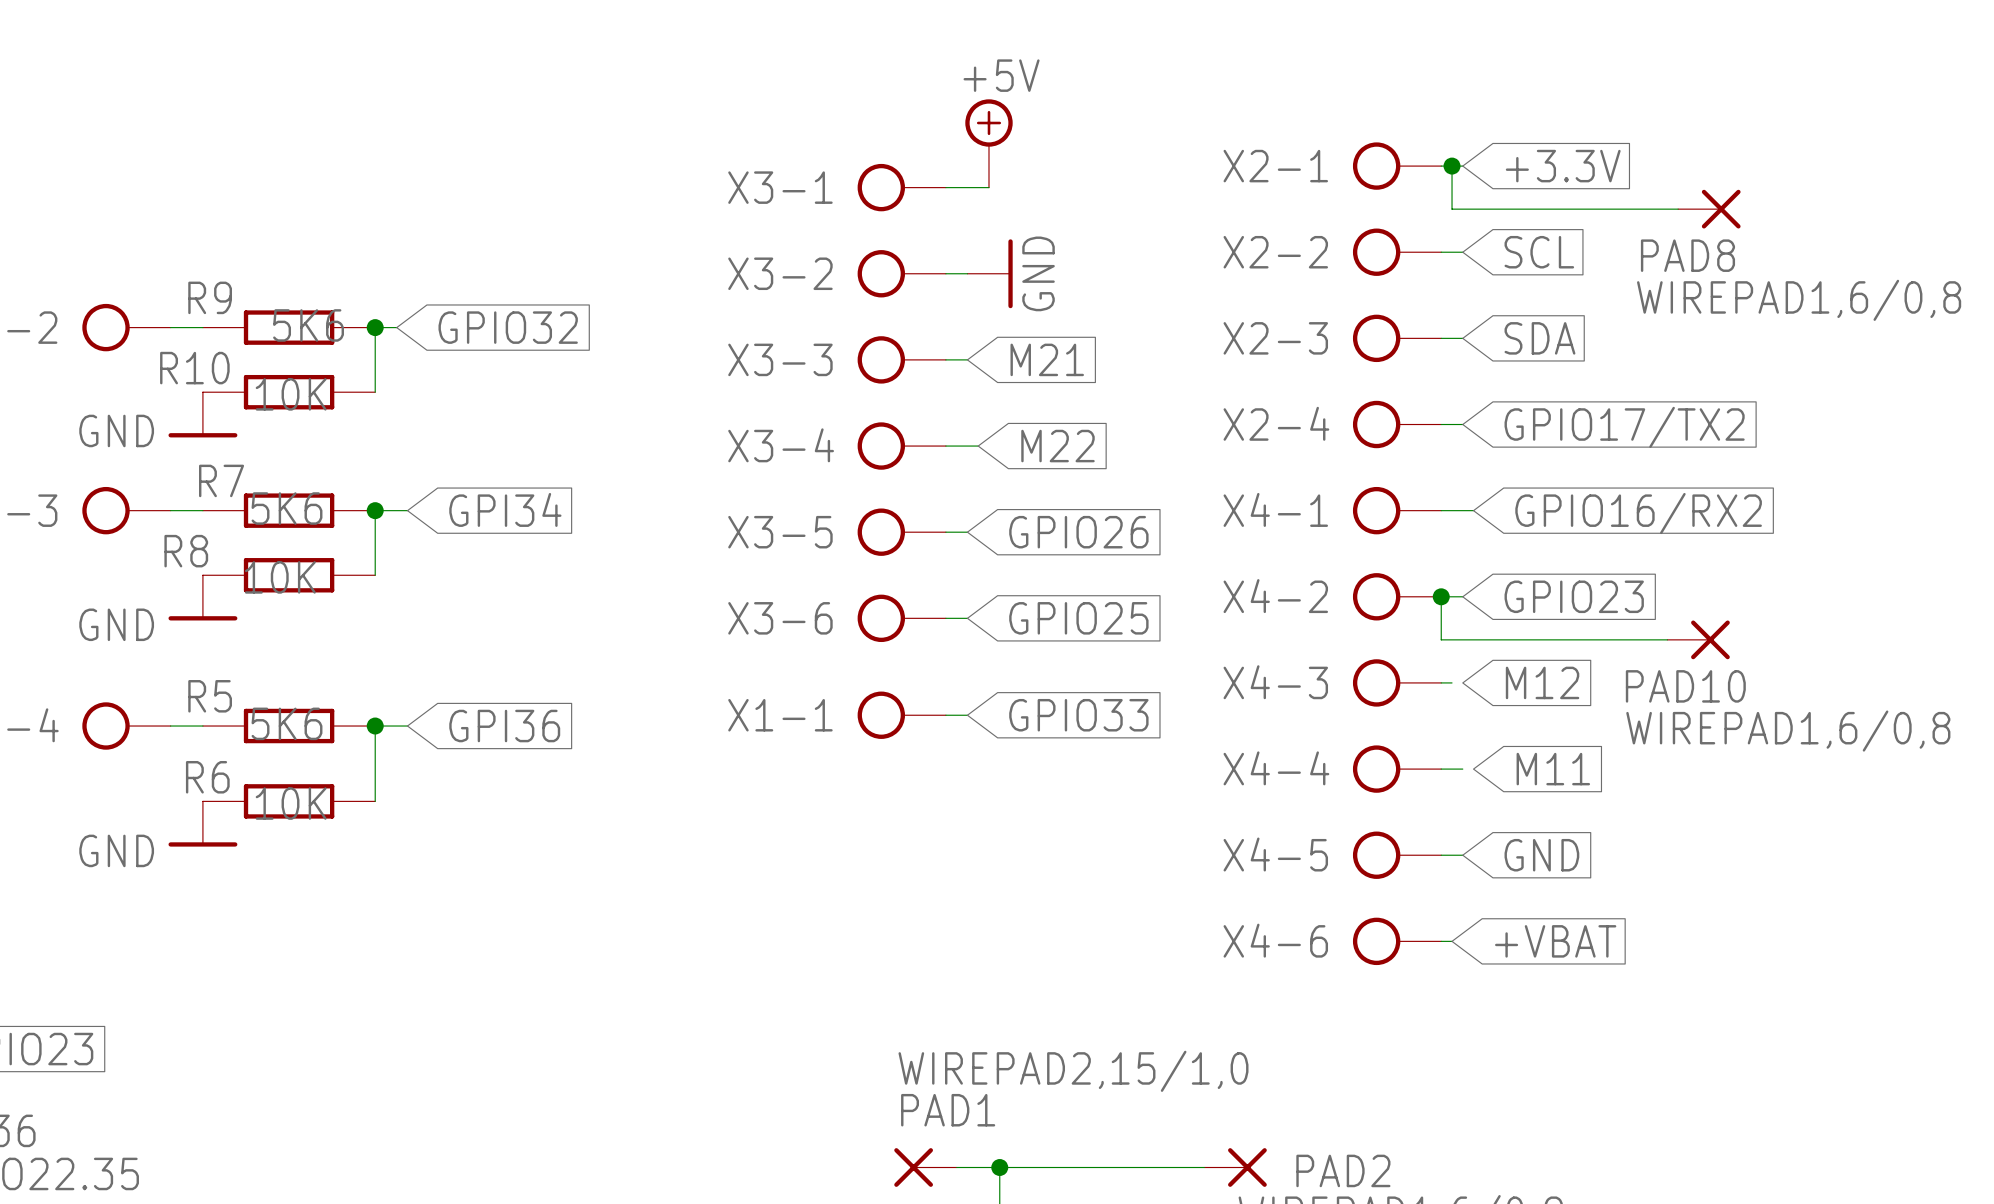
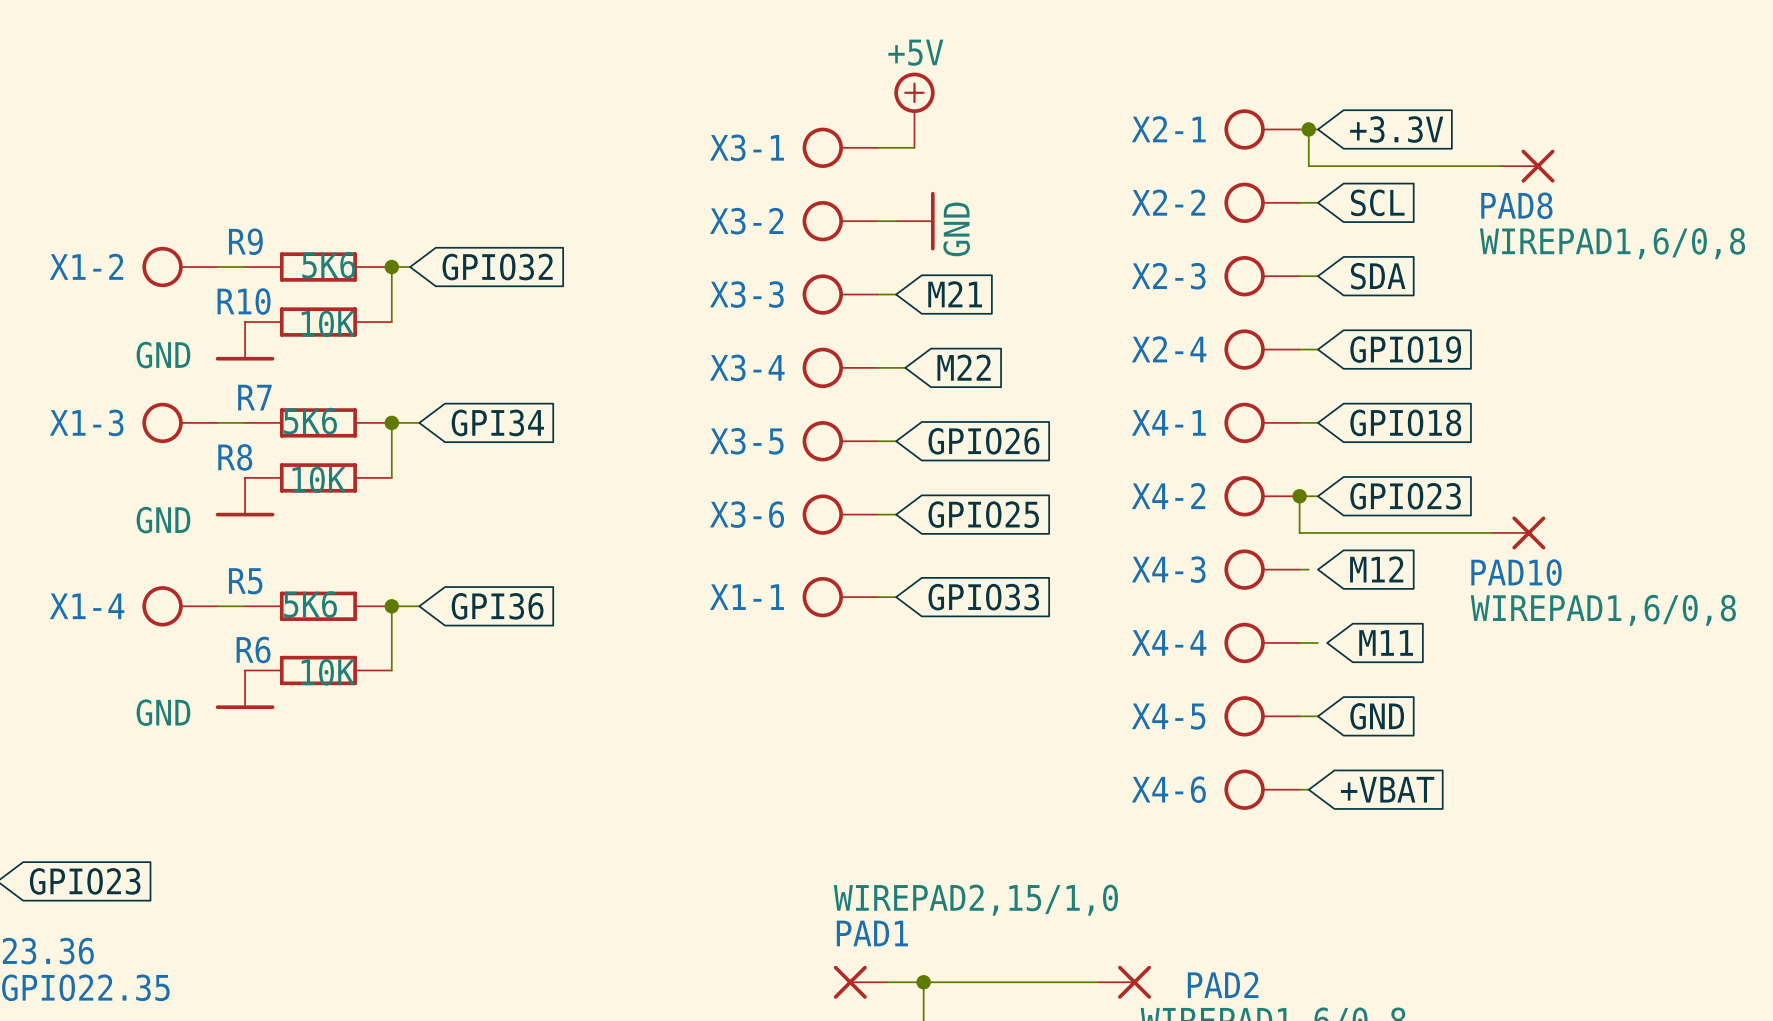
global label: GPIO17/TX2 (1624, 427) -> GPIO19 (1405, 349)
wire: (1462, 510) (1473, 510) -> none
global label: GPIO16/RX2 (1638, 513) -> GPIO18 (1405, 422)

